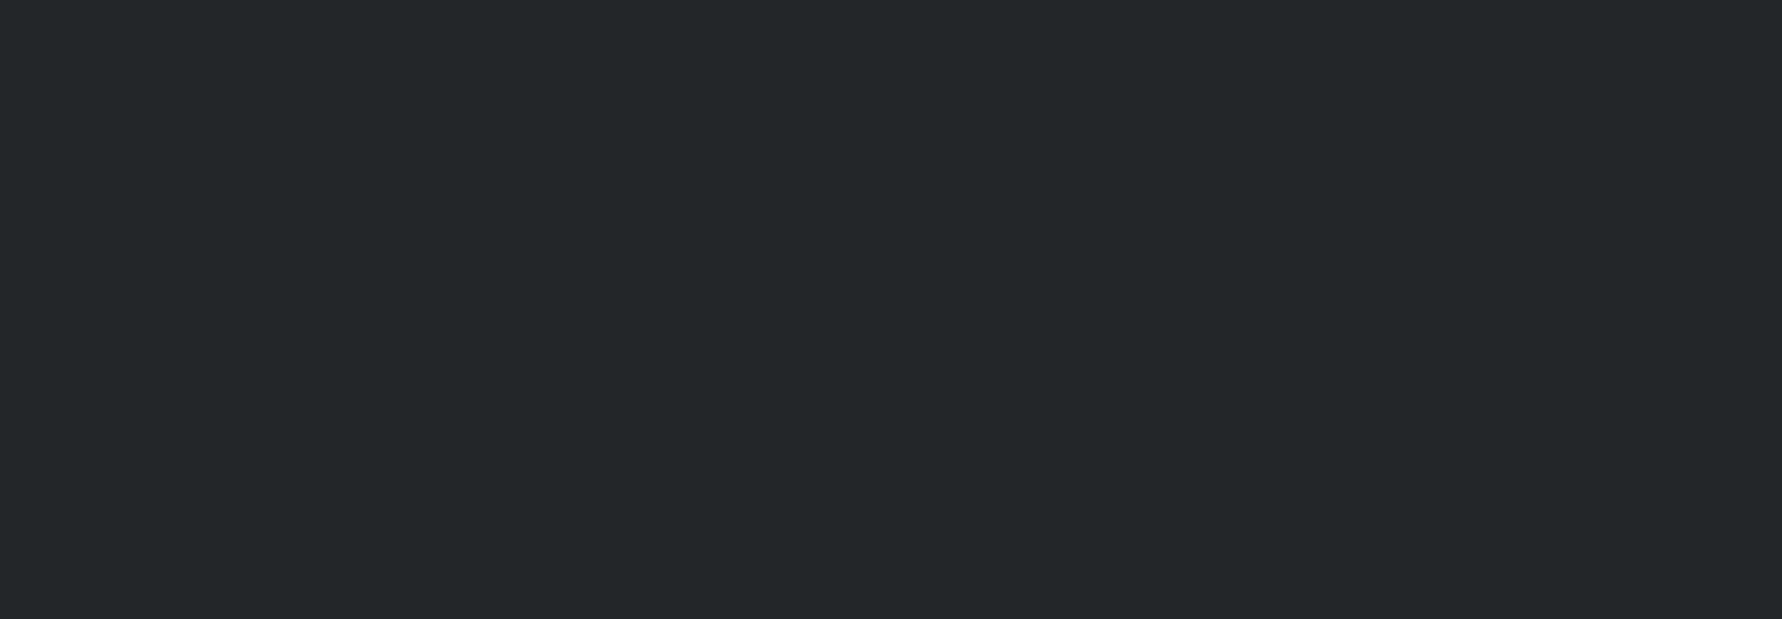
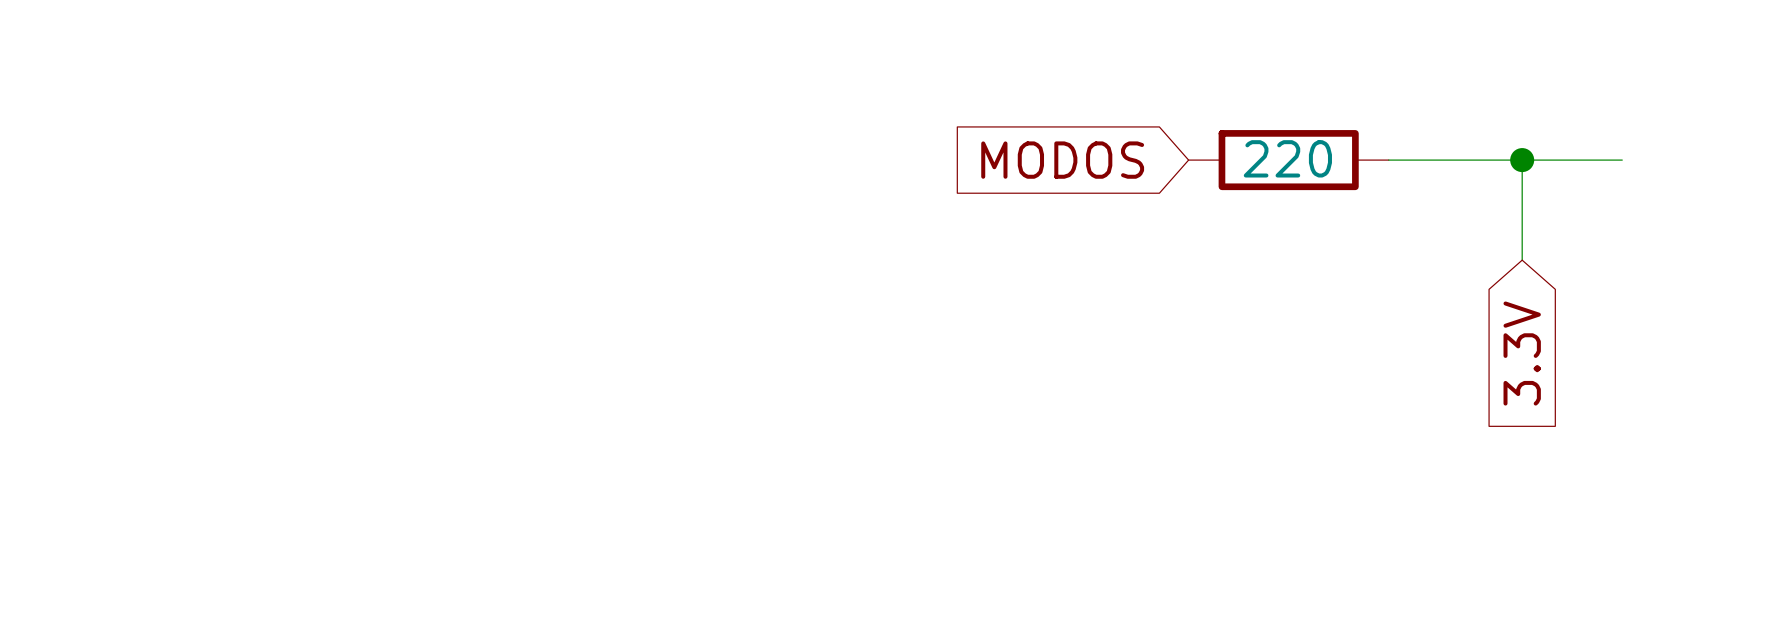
global label: none -> MODOS (1062, 160)
part: none -> 220 (1288, 160)
wire: none -> (1388, 160) (1622, 160)
wire: none -> (1522, 160) (1522, 260)
junction: none -> (1522, 160)
global label: none -> 3.3V (1522, 353)

